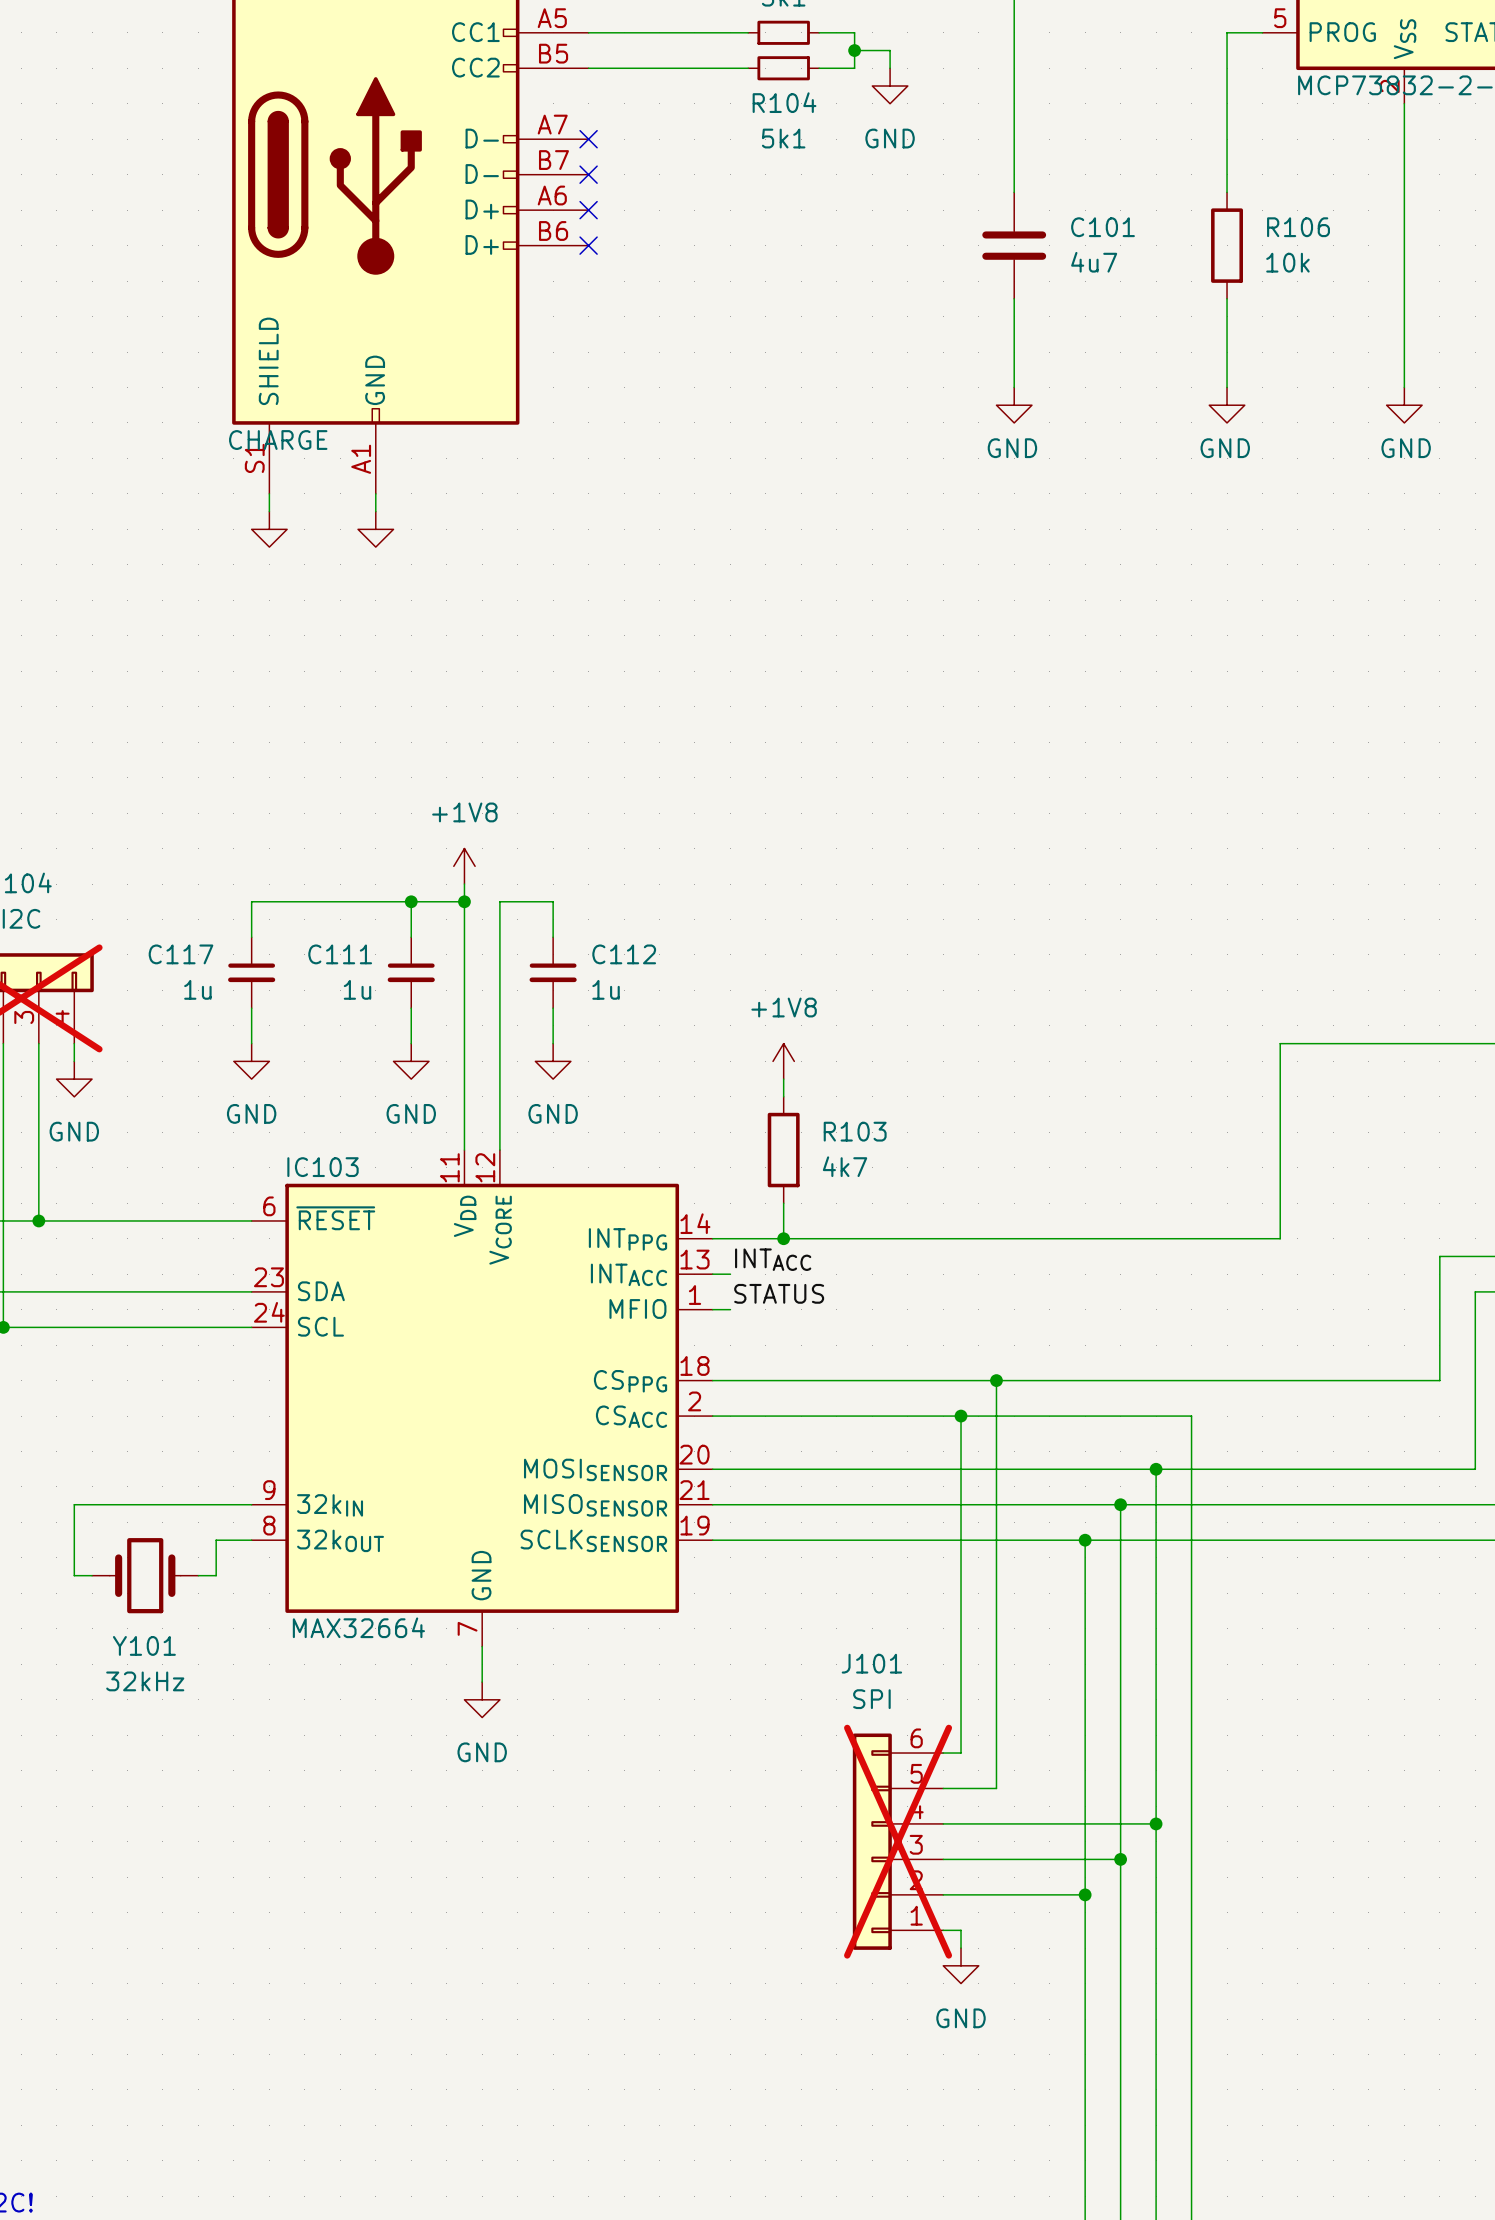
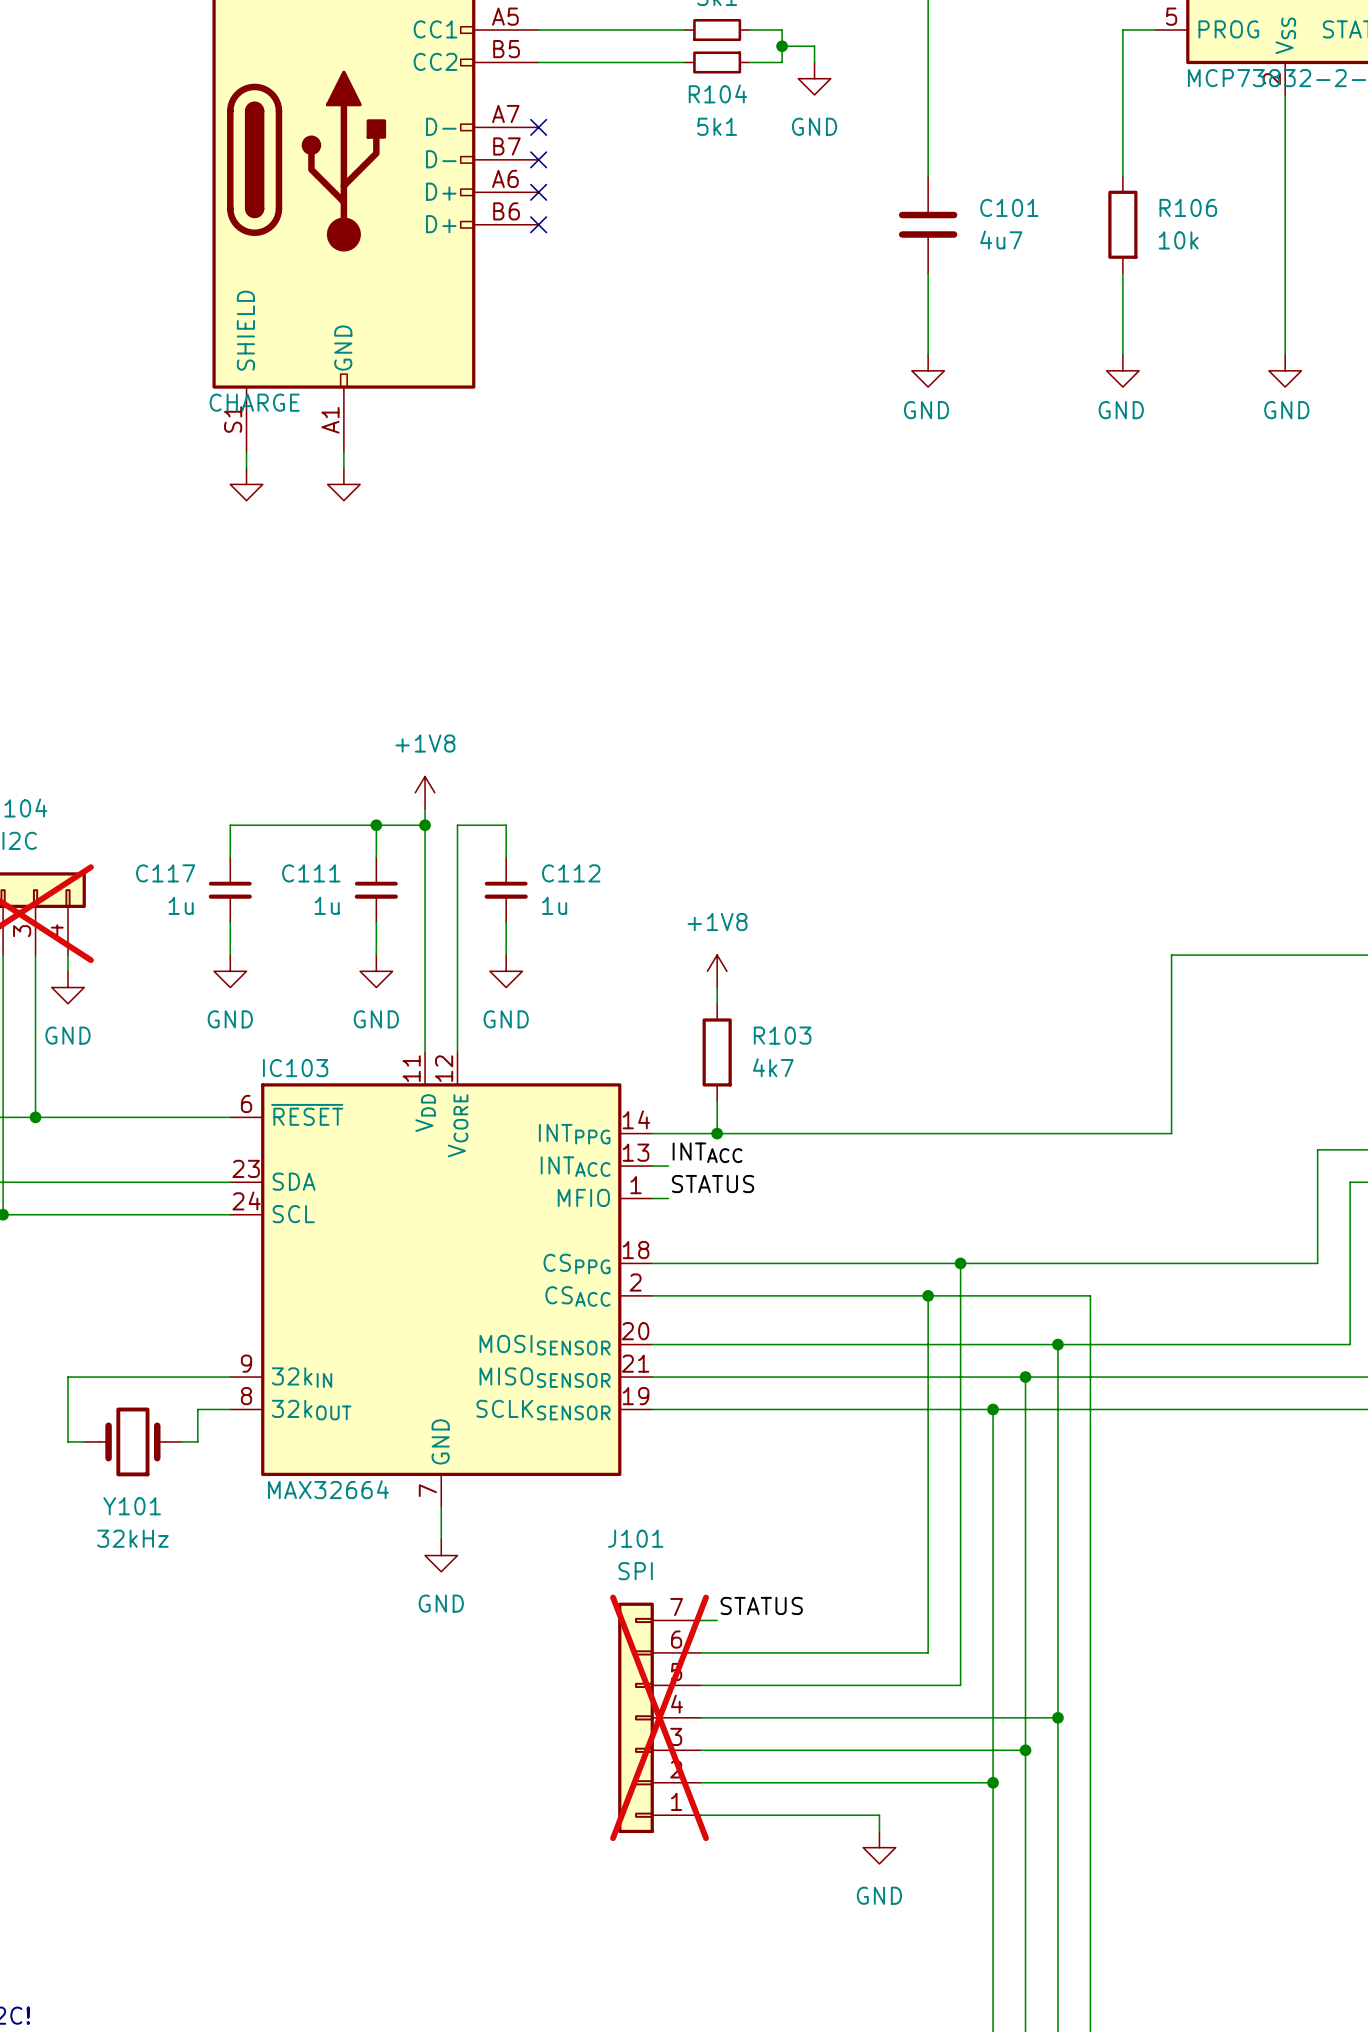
wire: (996, 1380) (996, 1788) (943, 1788) -> none
junction: (996, 1380) -> none
wire: none -> (960, 1263) (960, 1685) (700, 1685)
junction: none -> (960, 1263)
wire: (961, 1416) (961, 1753) (943, 1753) -> none
junction: (961, 1416) -> none
wire: none -> (928, 1295) (928, 1652) (700, 1652)
junction: none -> (928, 1295)
J101 symbol: [852, 1733, 944, 1950] -> [618, 1602, 701, 1834]
label: none -> STATUS (761, 1605)
wire: none -> (700, 1620) (717, 1620)
wire: (943, 1823) (1156, 1823) -> none
junction: (1156, 1823) -> none
wire: (943, 1859) (1120, 1859) -> none
junction: (1120, 1859) -> none
wire: none -> (700, 1717) (1057, 1717)
junction: none -> (1057, 1717)
wire: (943, 1894) (1085, 1894) -> none
junction: (1085, 1894) -> none
wire: none -> (700, 1750) (1025, 1750)
junction: none -> (1025, 1750)
wire: (943, 1930) (961, 1930) (961, 1948) -> none
wire: none -> (700, 1782) (993, 1782)
junction: none -> (993, 1782)
power symbol position: GND (961, 1965) -> GND (879, 1847)
wire: none -> (700, 1815) (879, 1815) (879, 1831)

